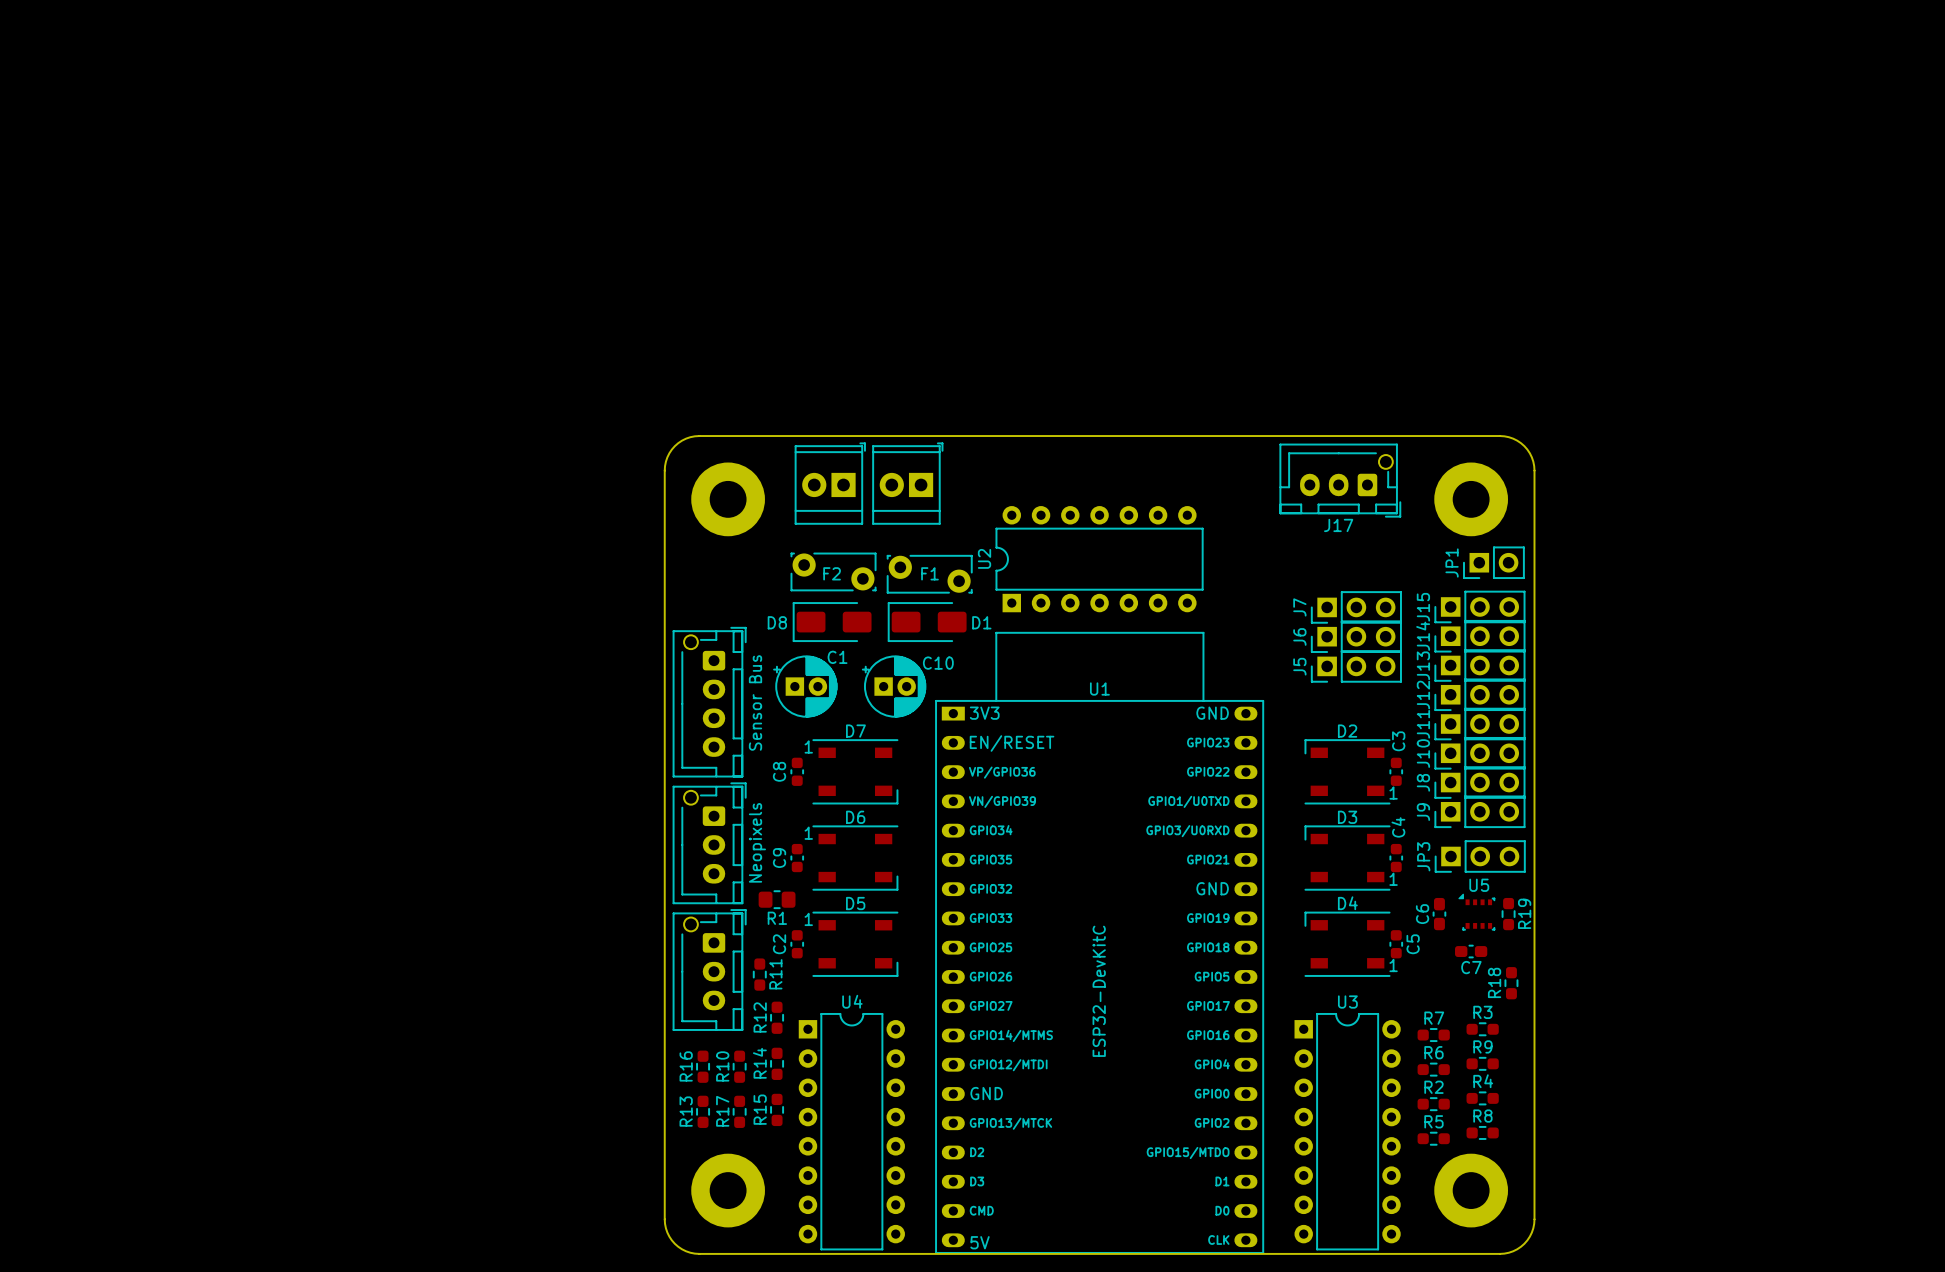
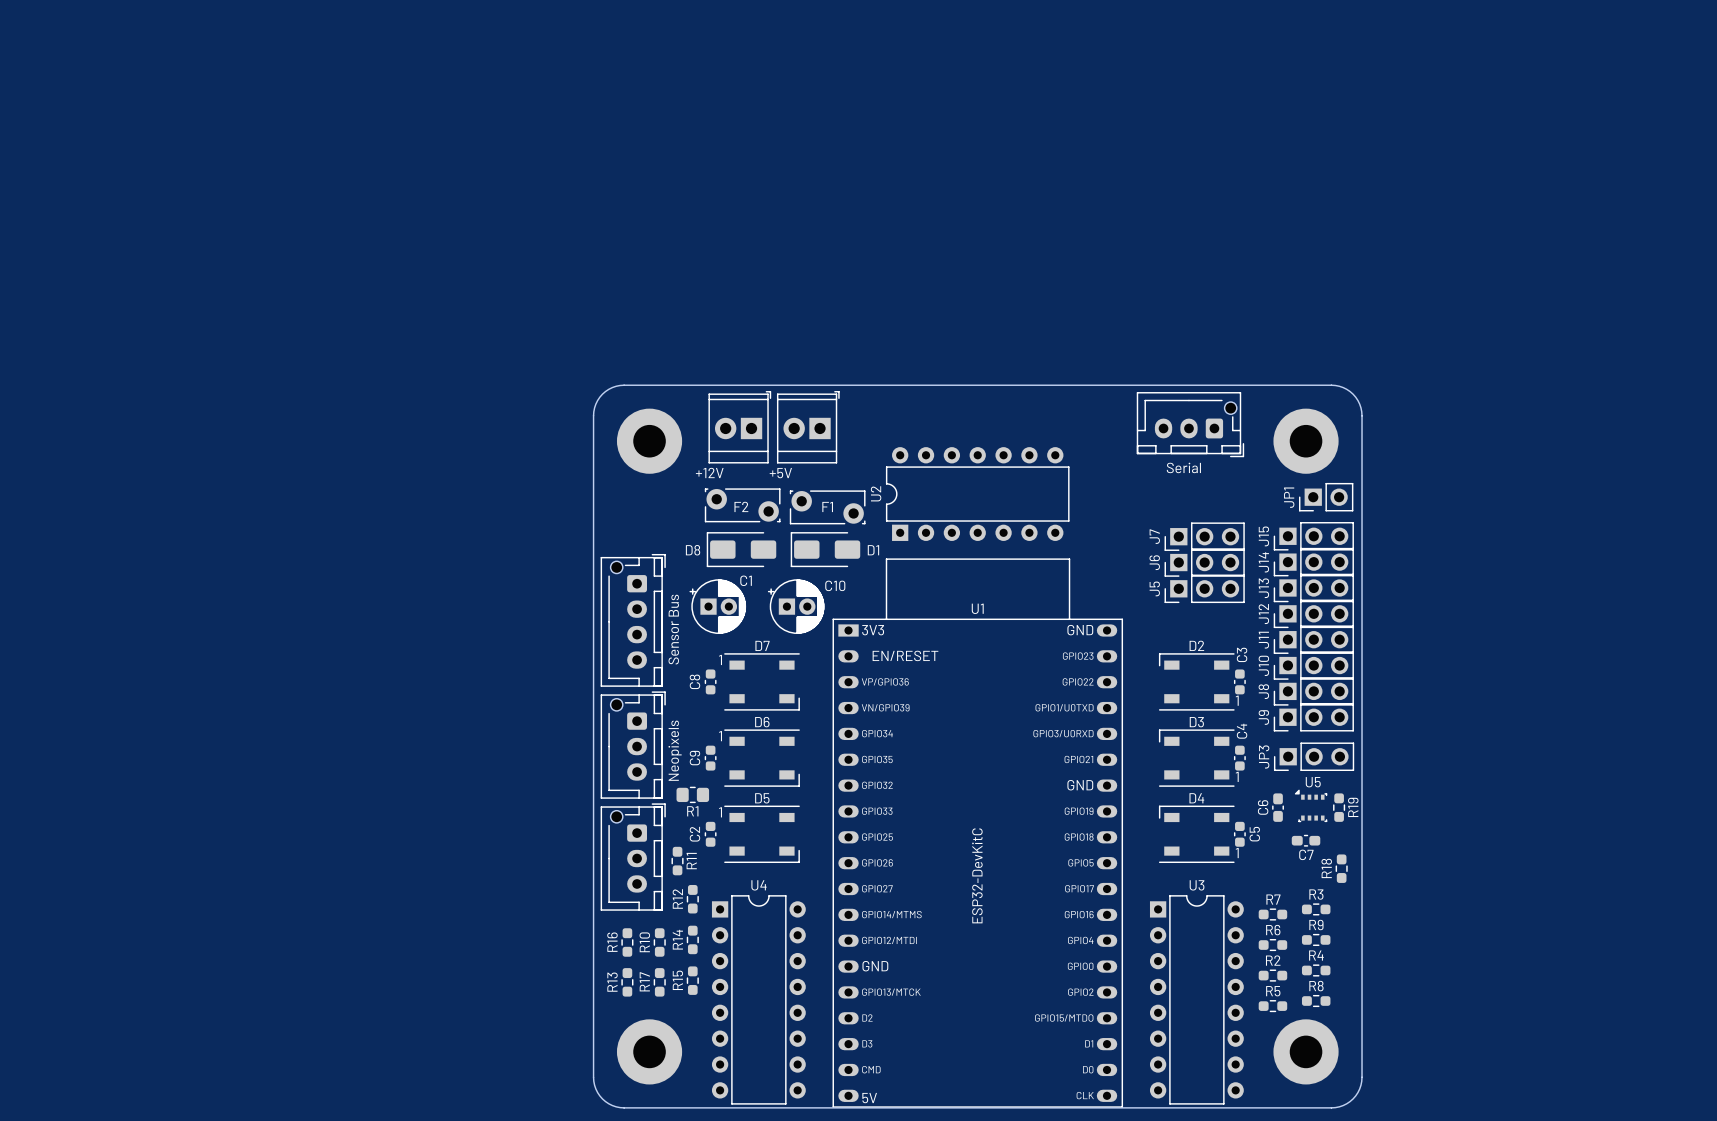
J17 name: J17 (1338, 525) -> none
text: none -> Serial (1183, 467)
text: none -> +12V (709, 472)
text: none -> +5V (780, 473)

